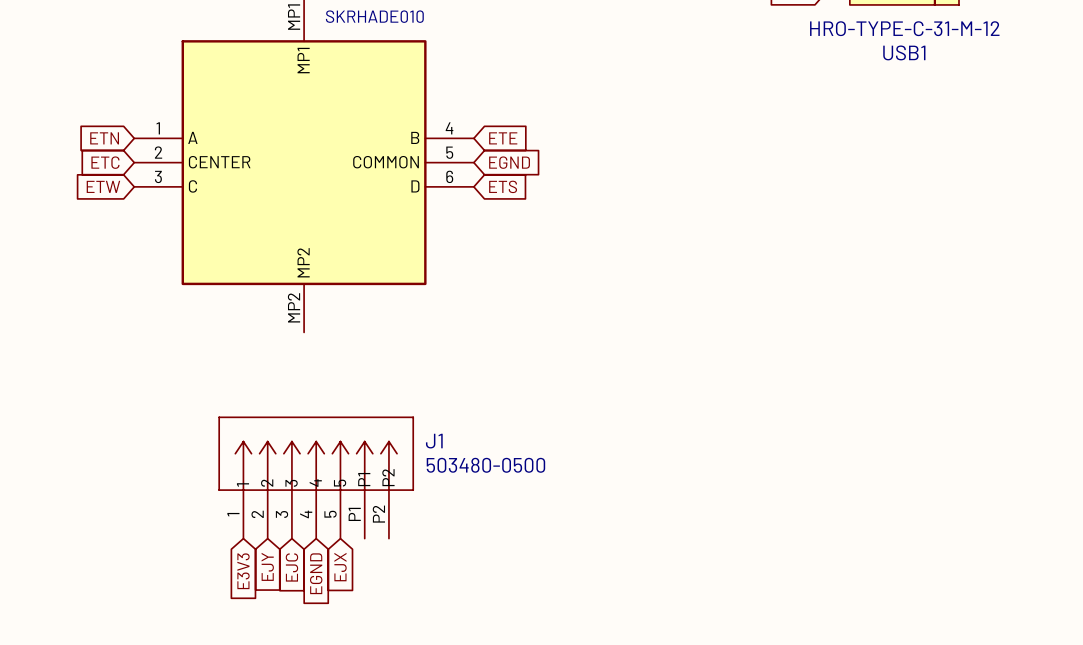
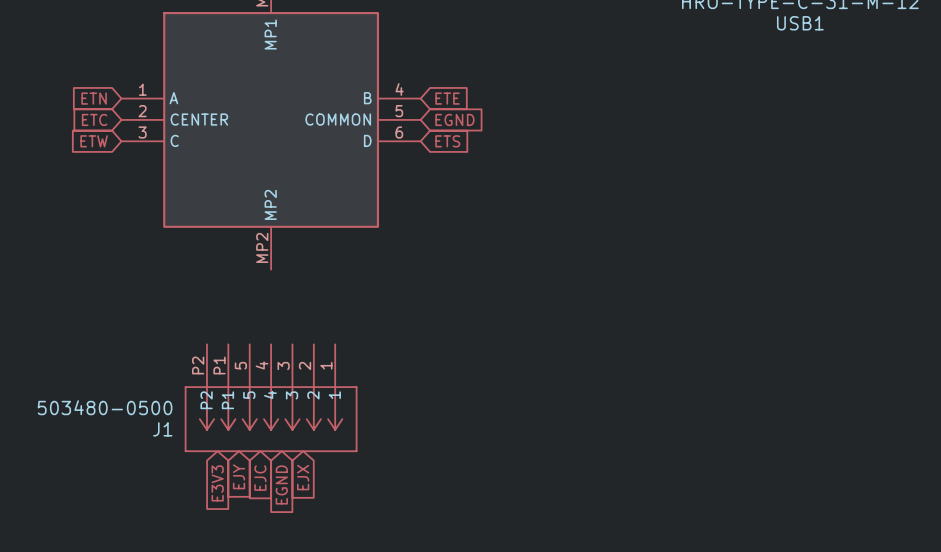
J1 rotation: 0° (316, 453) -> 180° (271, 419)

